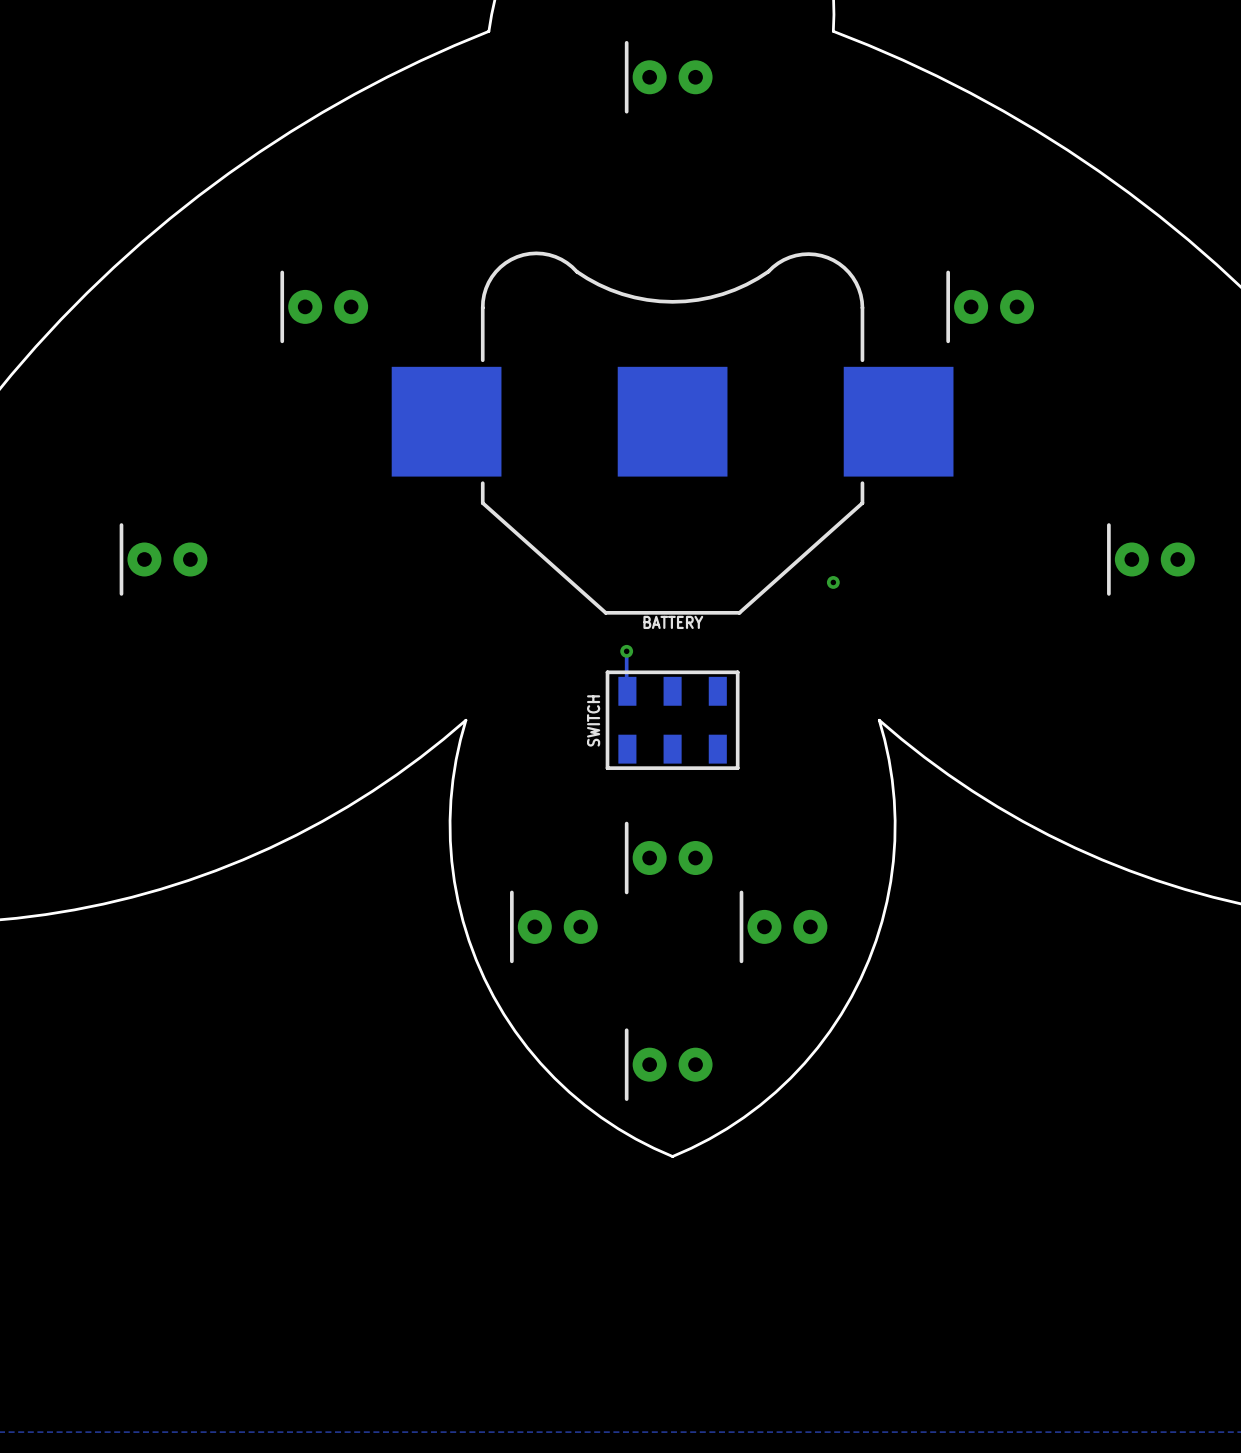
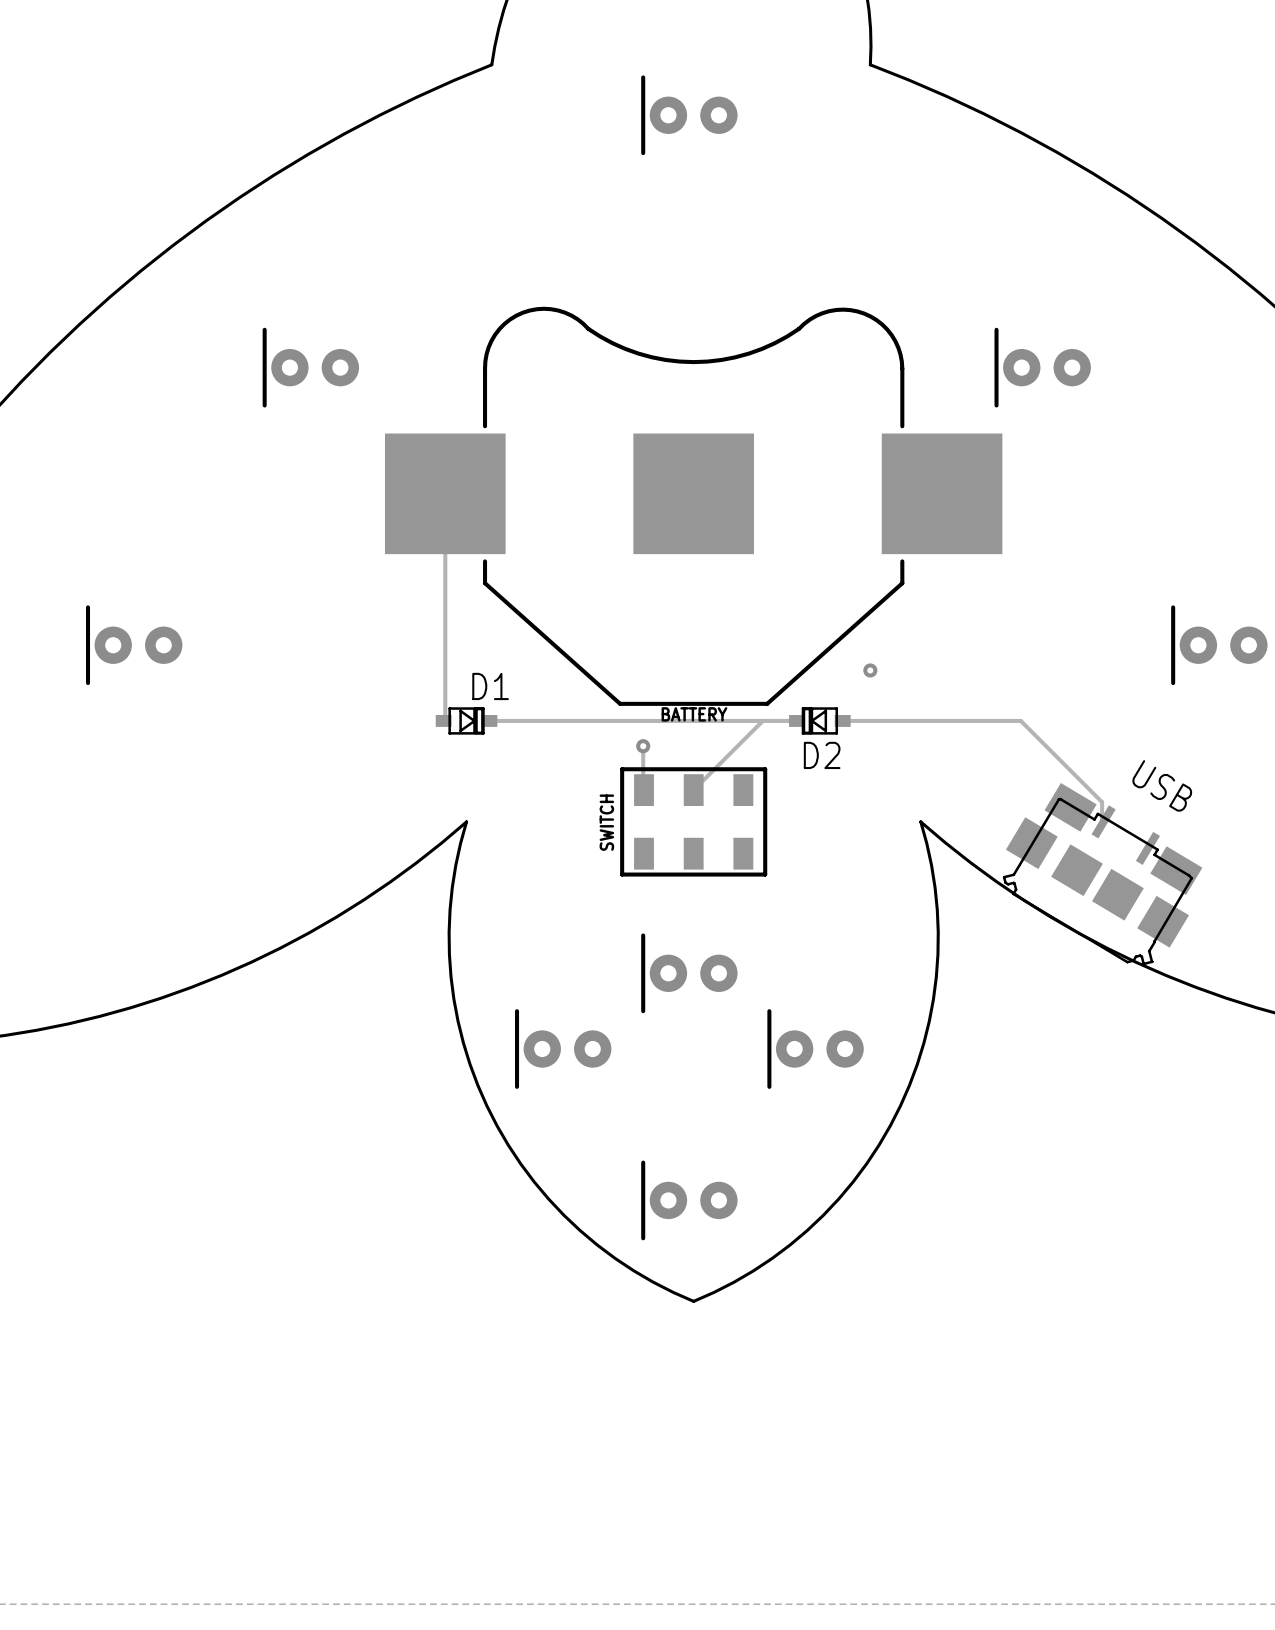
track: none -> (445, 493) (445, 719) (443, 720)
D1: none -> (466, 720)
track: none -> (762, 720) (693, 790)
track: none -> (797, 720) (489, 720)
D2: none -> (819, 720)
track: none -> (842, 720) (1020, 720) (1102, 802) (1103, 821)
USB: none -> (1102, 874)

